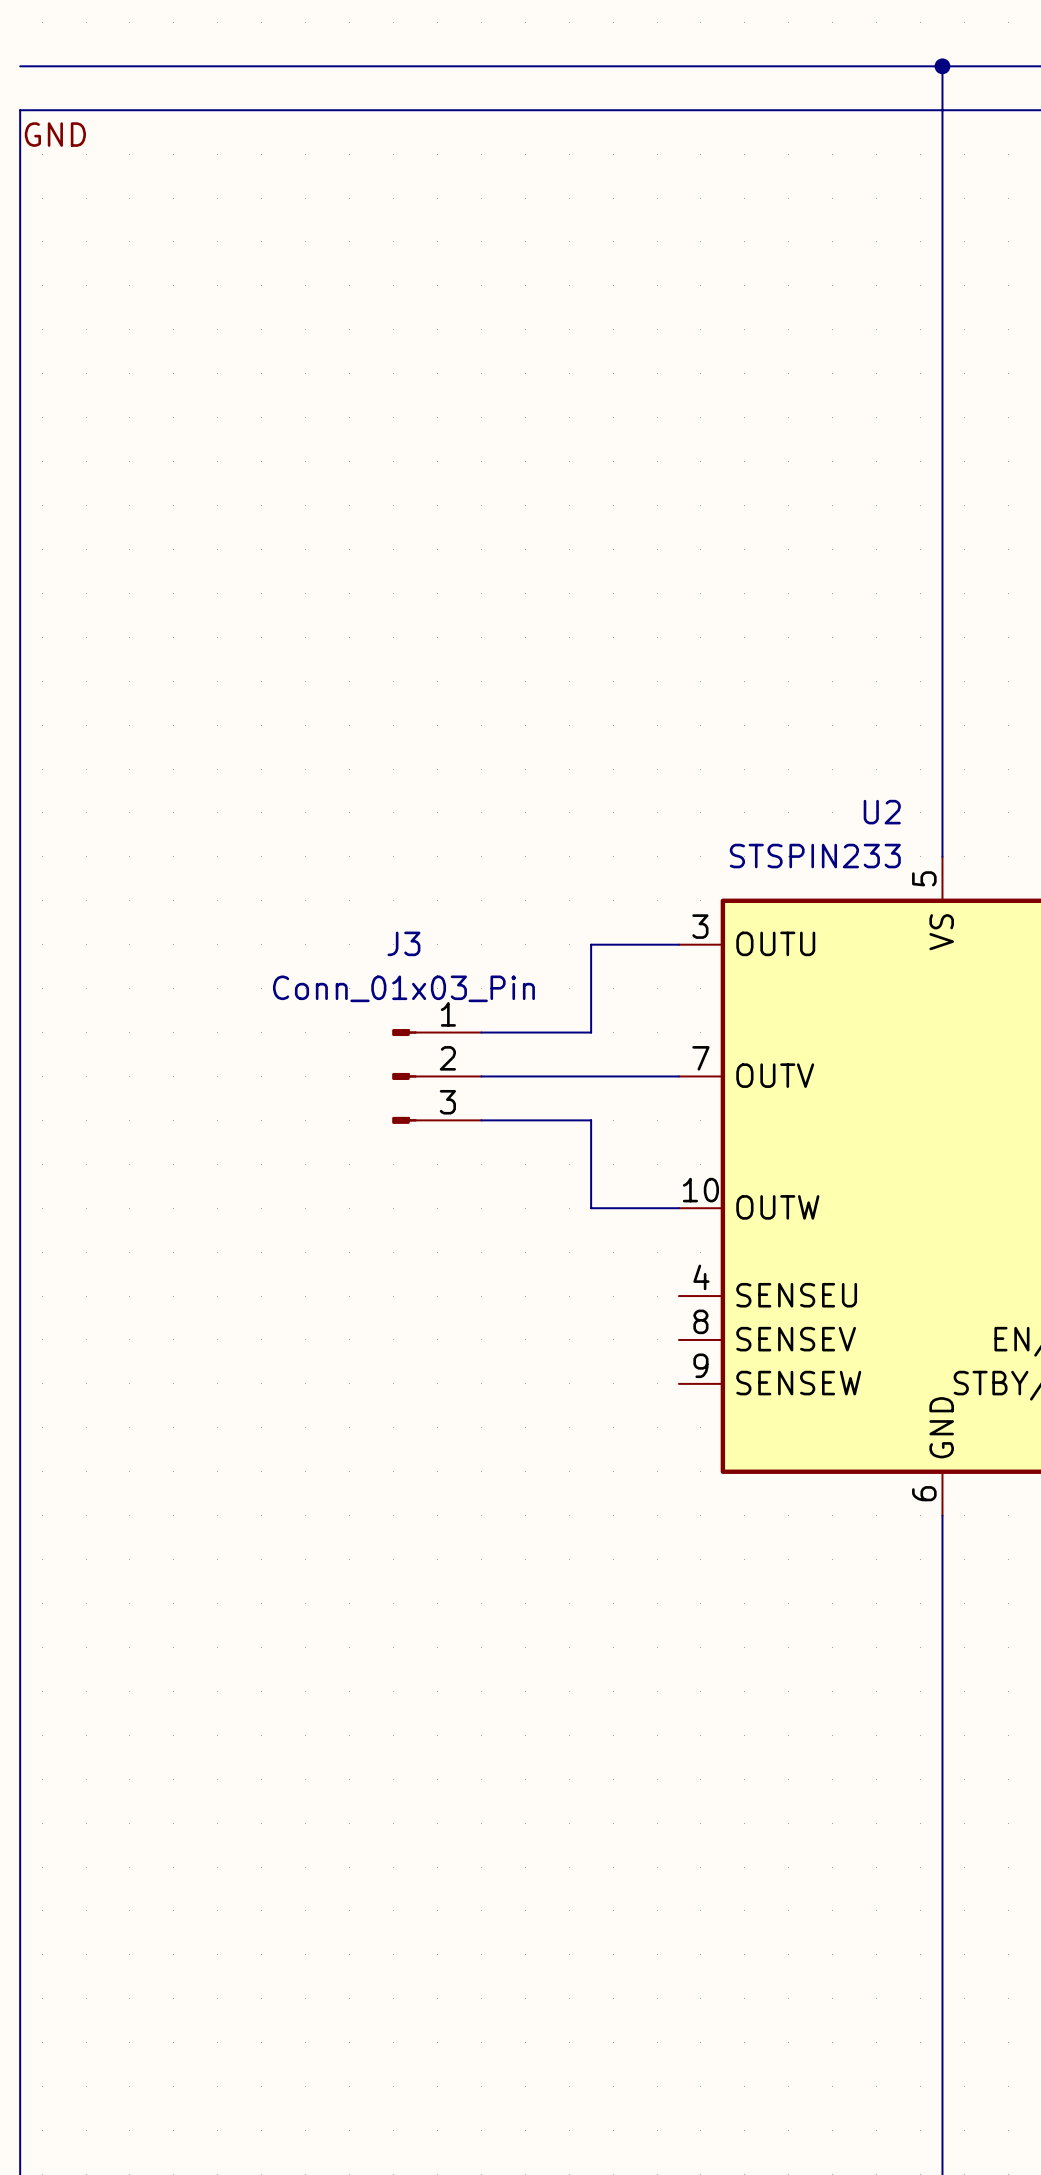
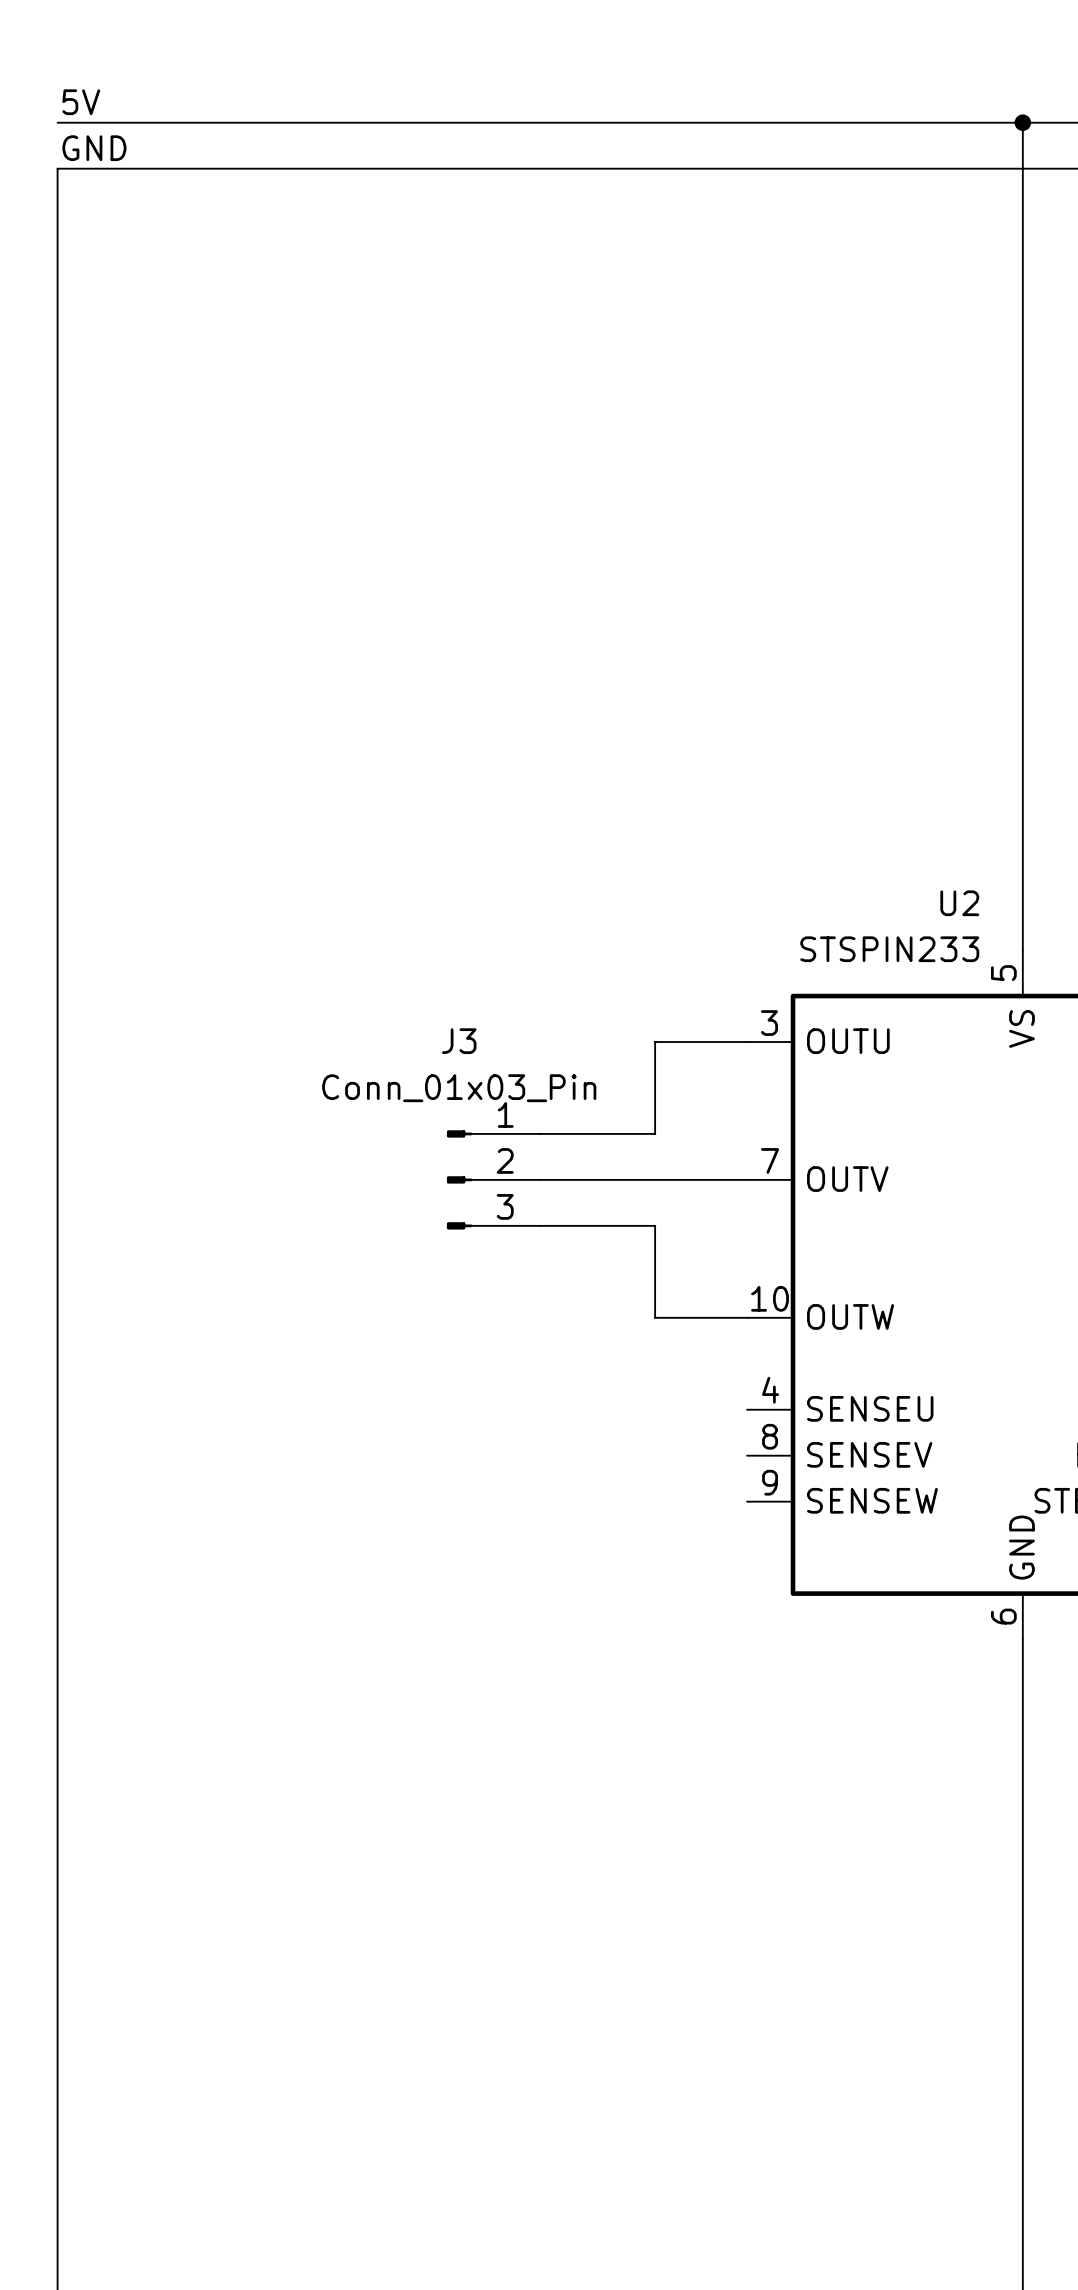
label: none -> 5V (81, 102)
label position: GND (55, 134) -> GND (94, 148)

